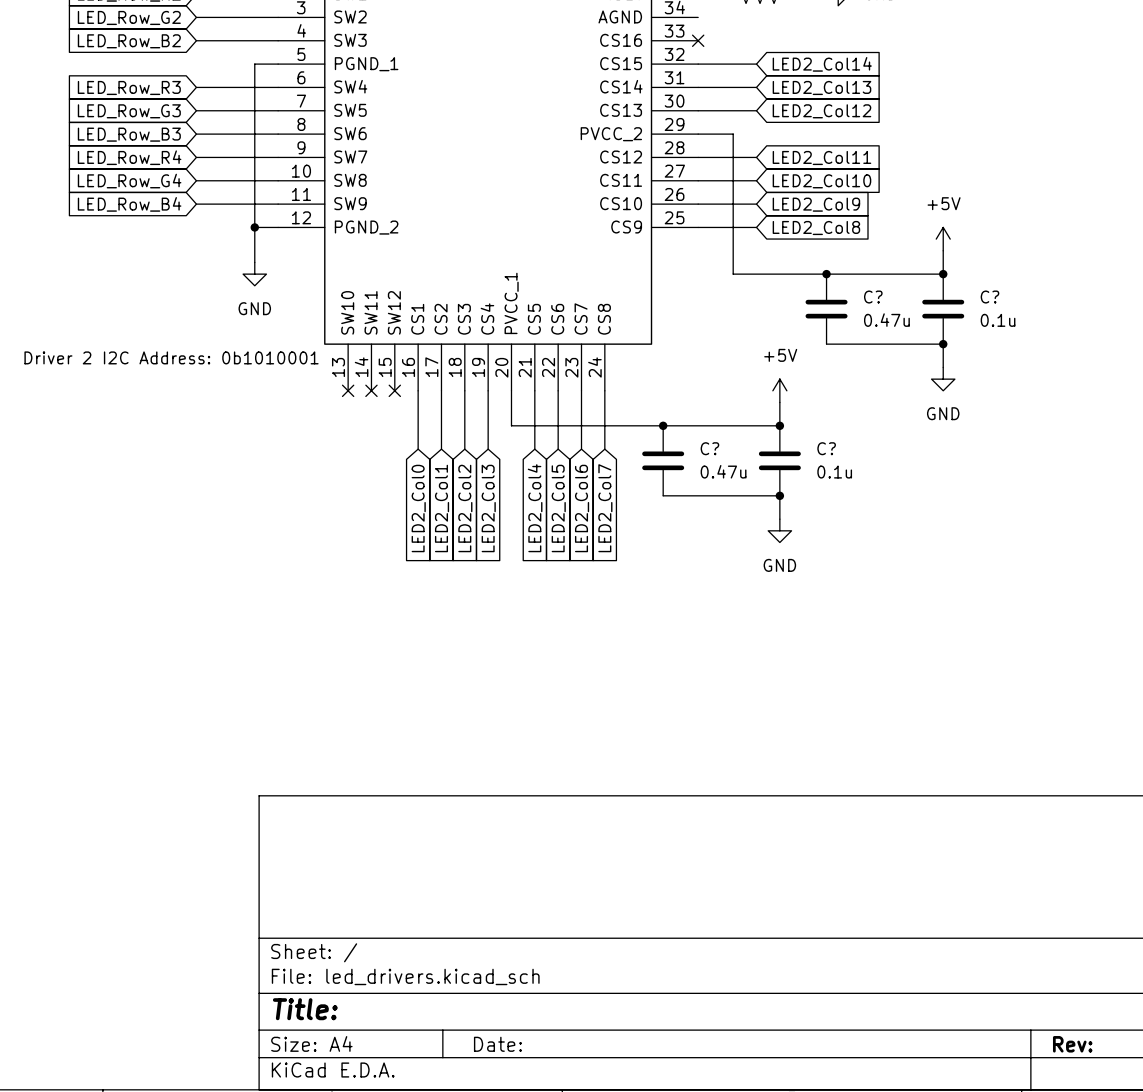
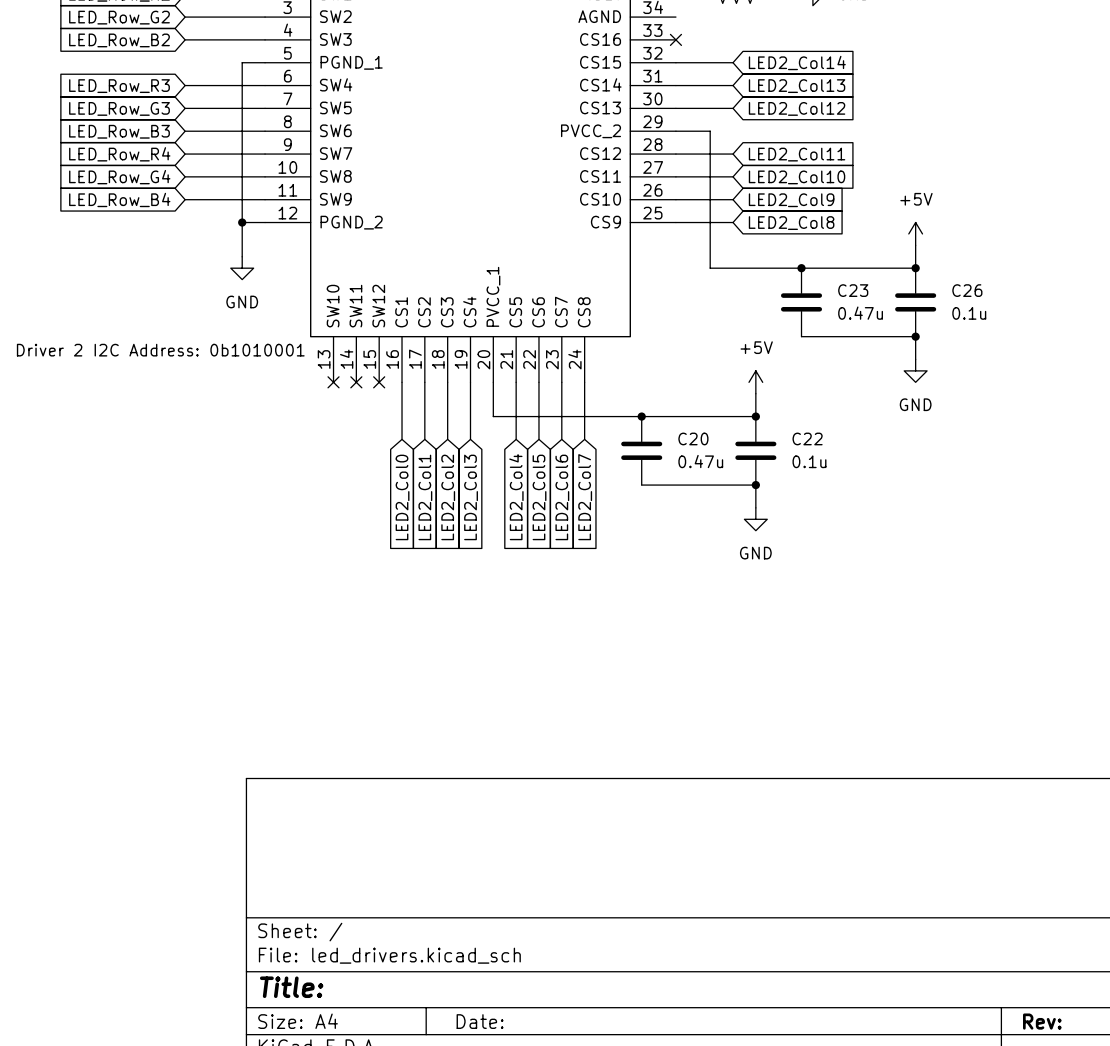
C? name: C? (873, 297) -> C23 (853, 290)
C? name: C? (989, 297) -> C26 (967, 290)
C? name: C? (709, 448) -> C20 (693, 438)
C? name: C? (826, 448) -> C22 (807, 438)

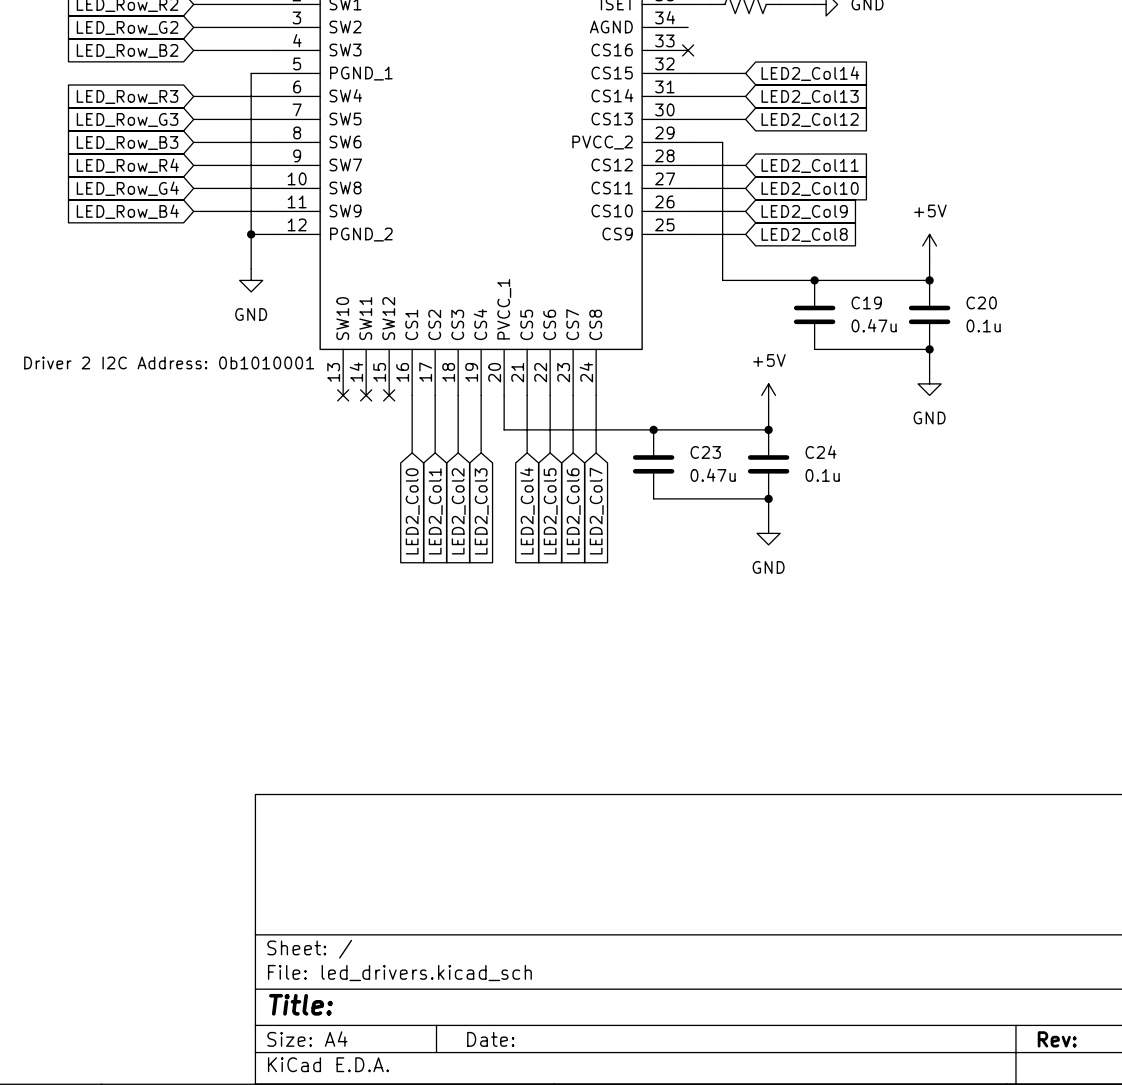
C23 name: C23 (853, 290) -> C19 (866, 302)
C26 name: C26 (967, 290) -> C20 (981, 302)
C20 name: C20 (693, 438) -> C23 (705, 452)
C22 name: C22 (807, 438) -> C24 (820, 452)

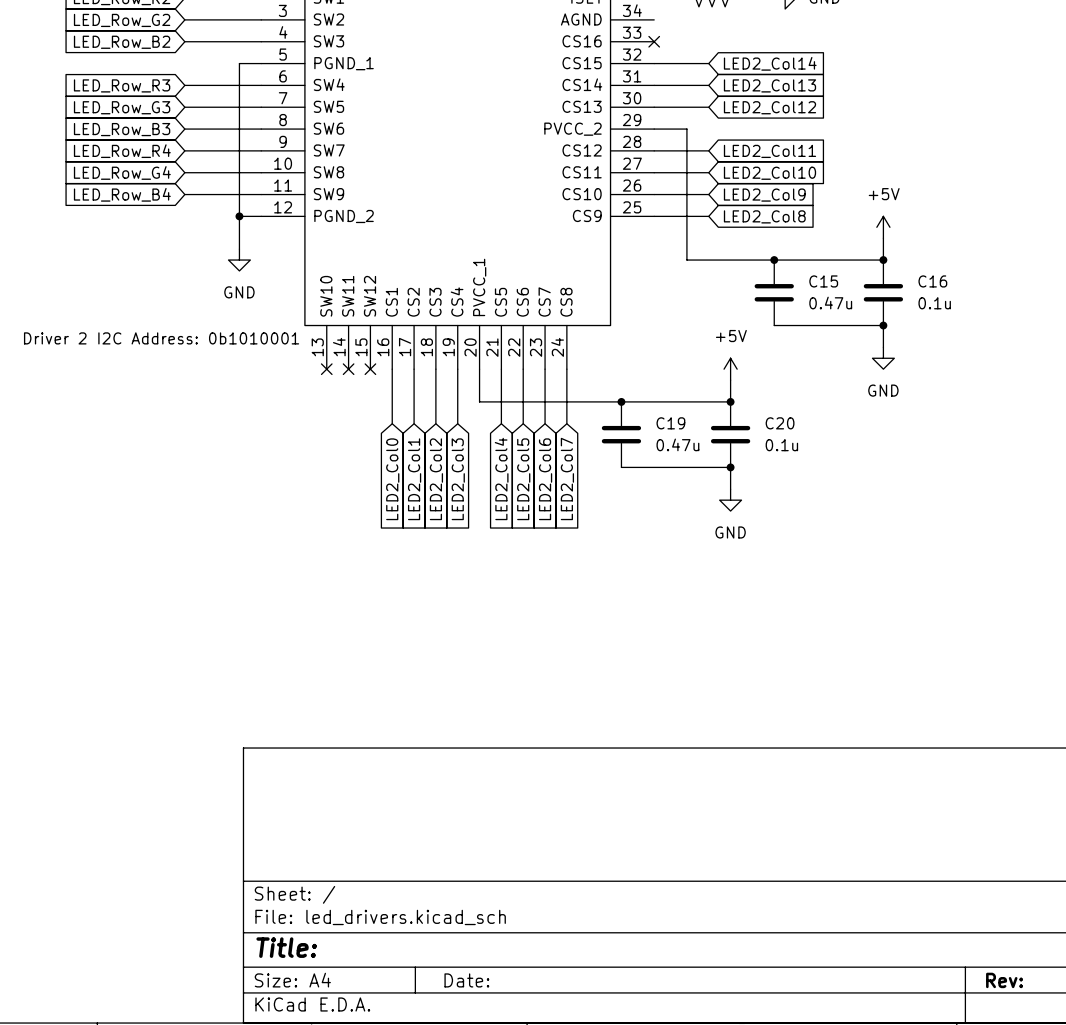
C19 name: C19 (866, 302) -> C15 (823, 281)
C20 name: C20 (981, 302) -> C16 (932, 281)
C23 name: C23 (705, 452) -> C19 (670, 423)
C24 name: C24 (820, 452) -> C20 (780, 423)

